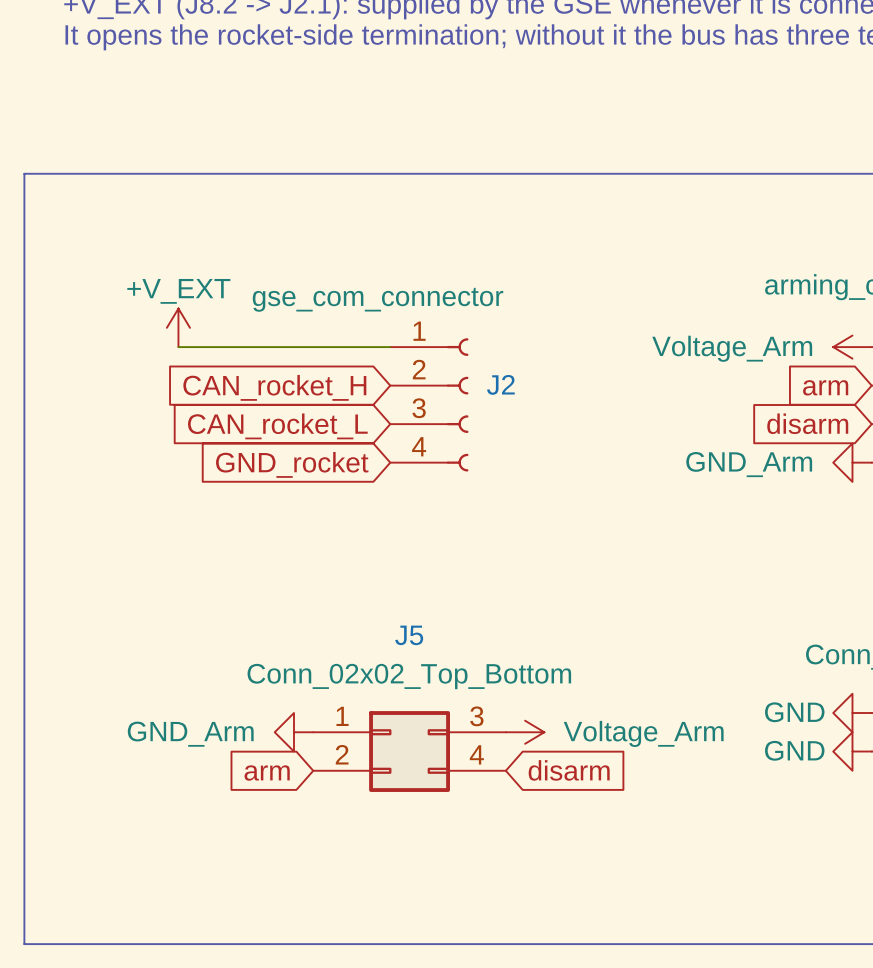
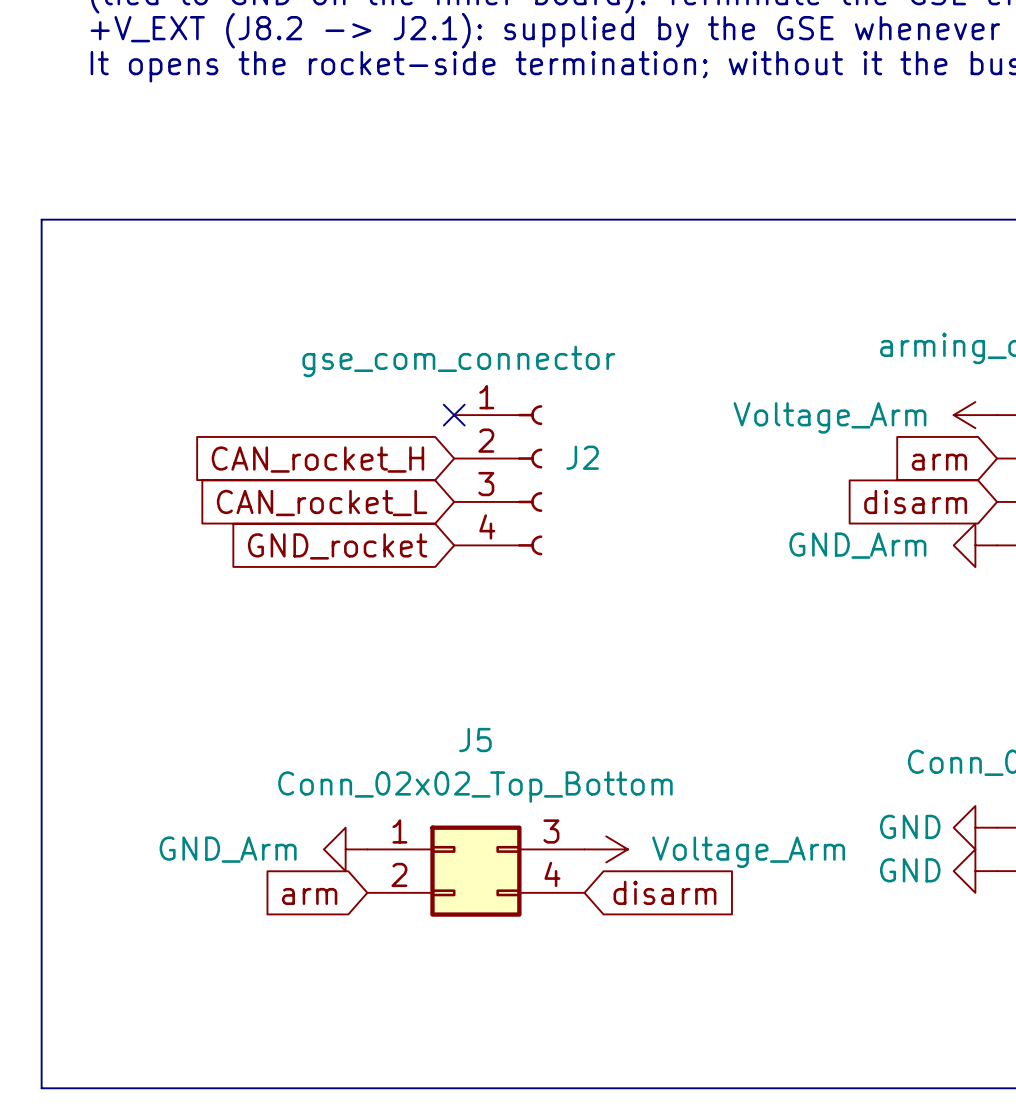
power symbol: +V_EXT (178, 327) -> none
wire: (178, 347) (390, 347) -> none
no-connect mark: none -> (454, 415)

